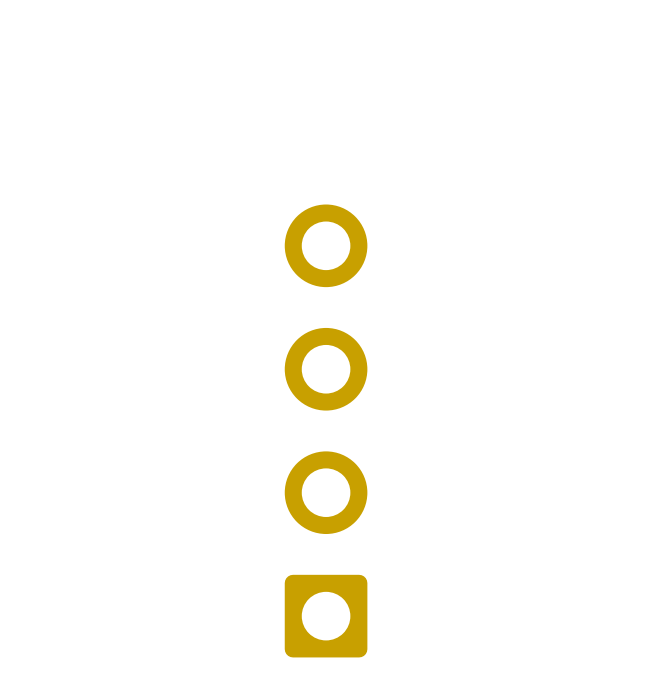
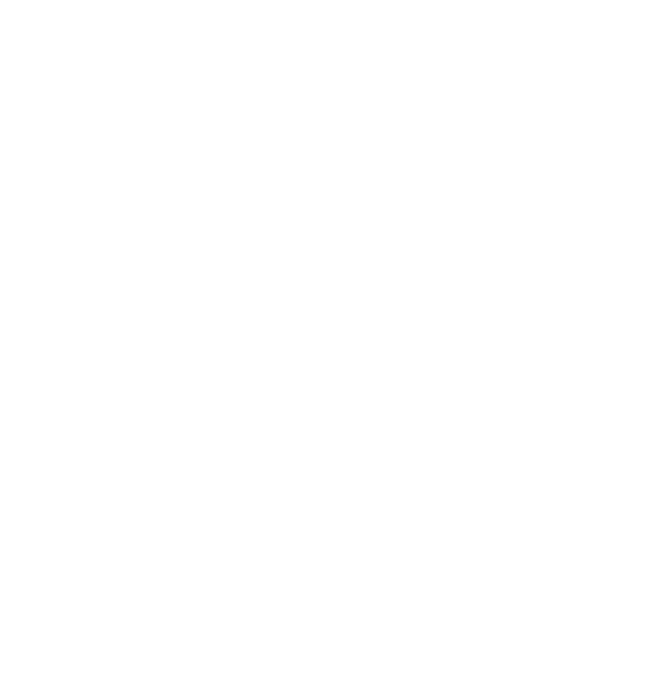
part: (326, 430) -> none

